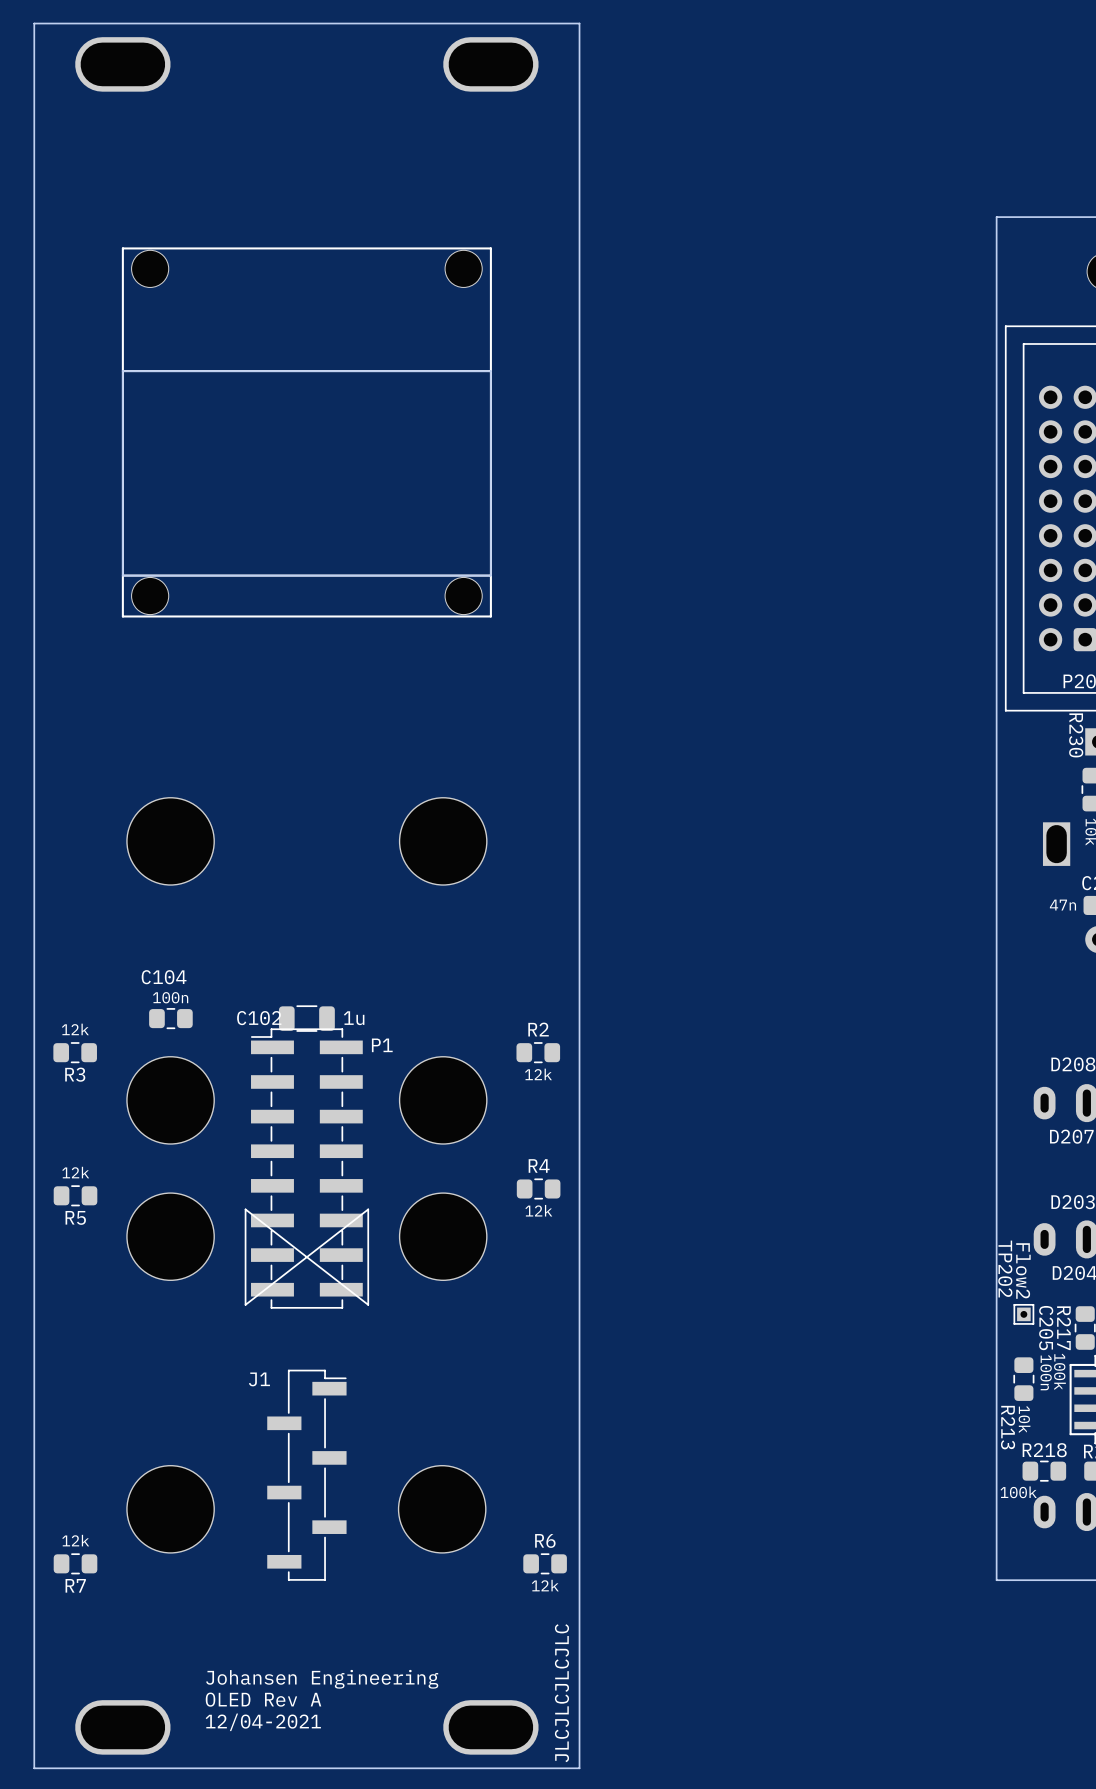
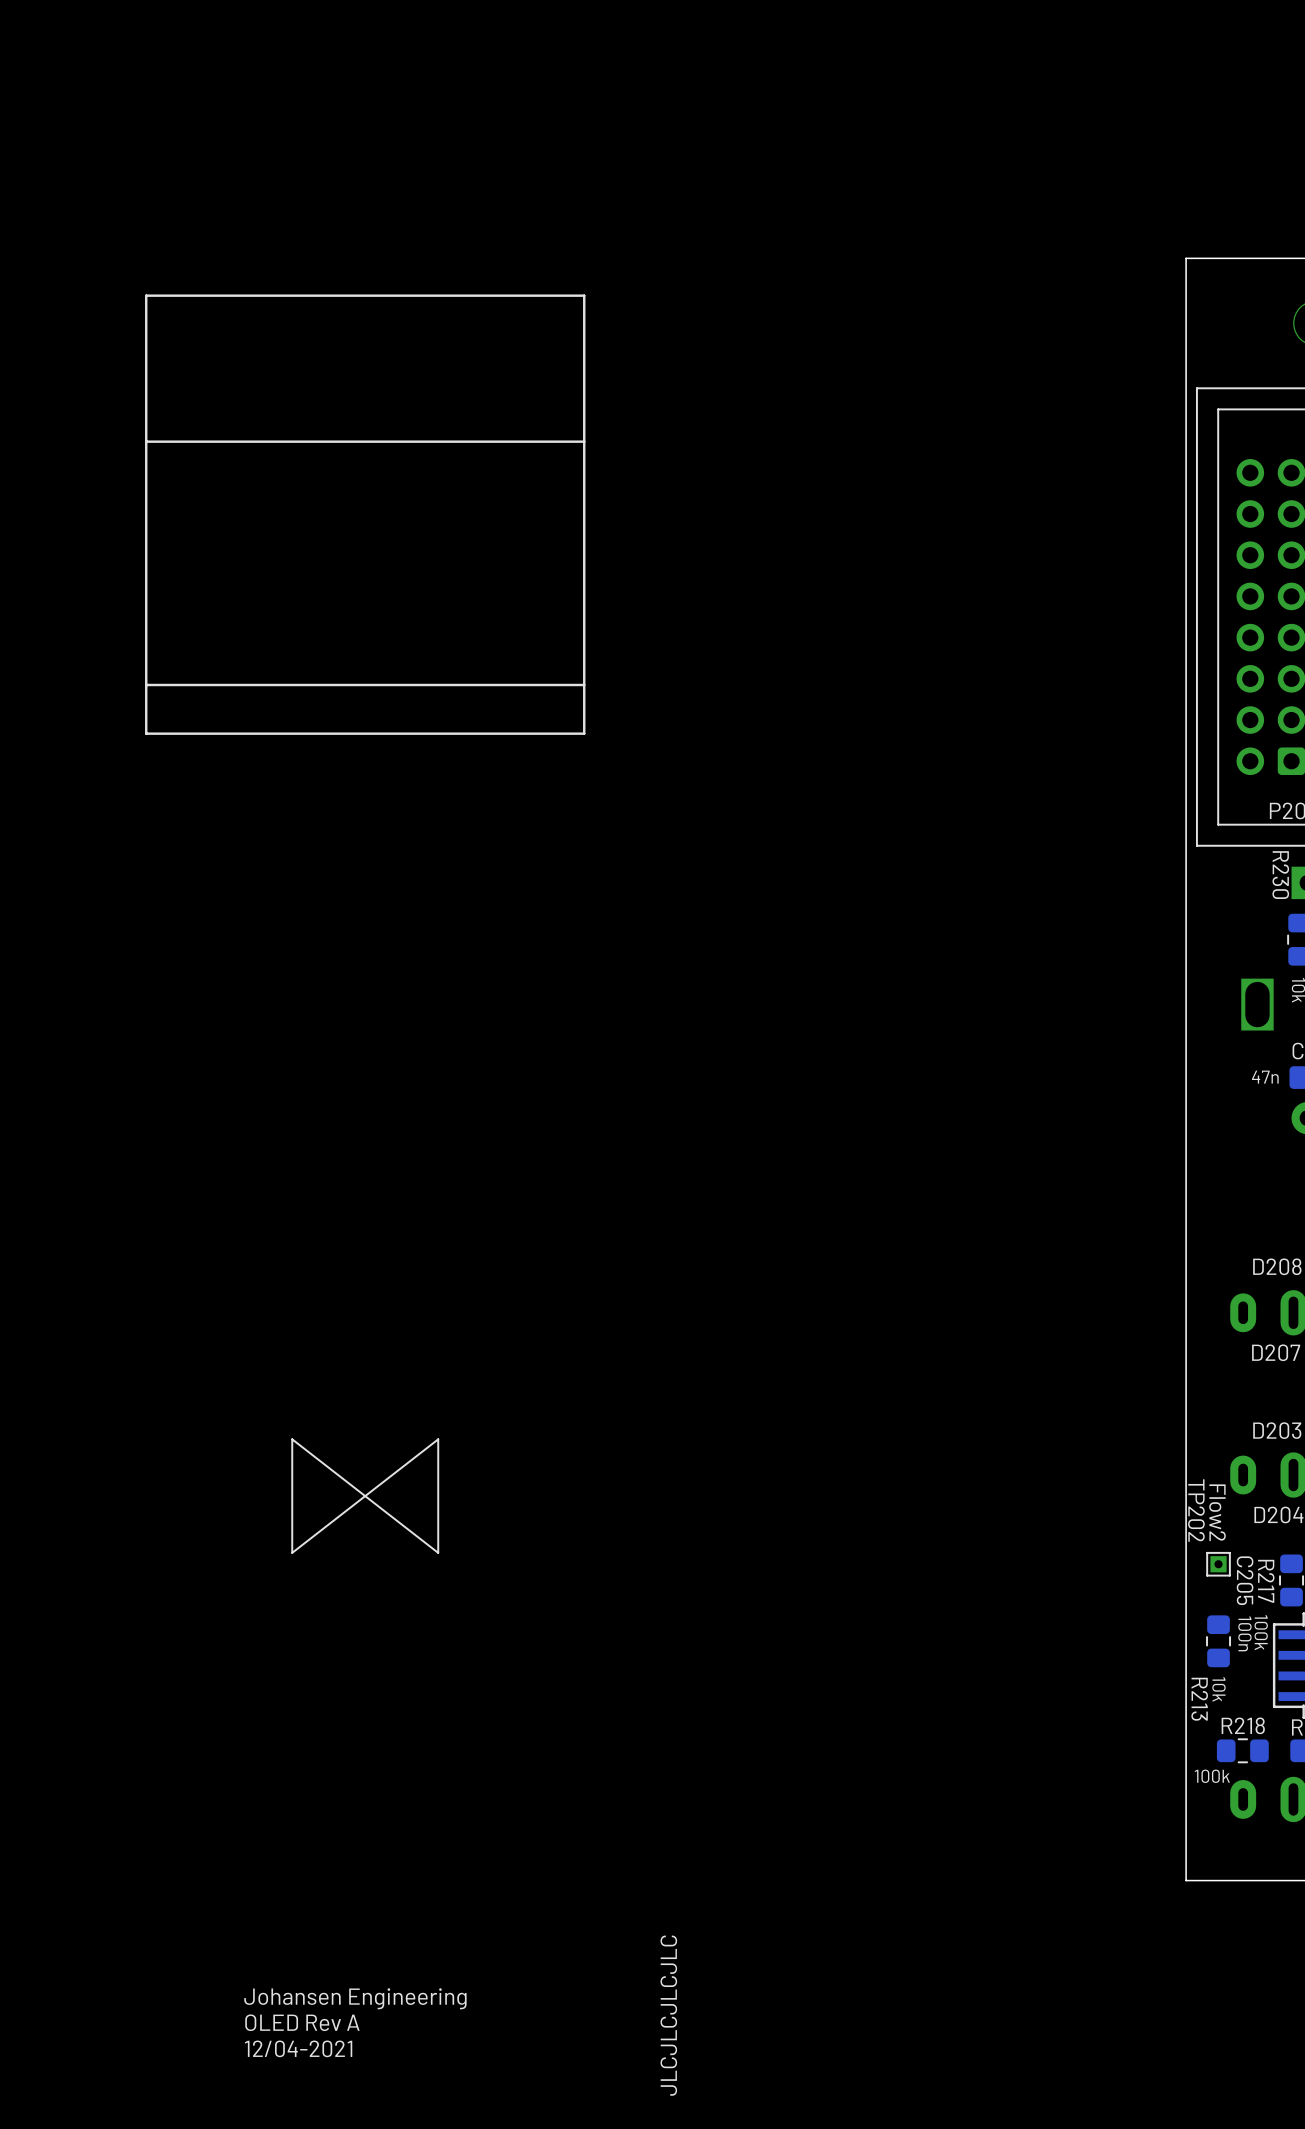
board edge: (579, 23) (34, 23) (34, 1768) (579, 1768) (579, 23) -> none
part: (122, 64) -> none
part: (490, 64) -> none
part: (150, 268) -> none
part: (463, 268) -> none
board edge: (490, 371) (490, 575) (122, 575) (122, 371) (490, 371) -> none
part: (150, 596) -> none
part: (463, 596) -> none
part: (170, 841) -> none
part: (443, 841) -> none
C104: 100n (170, 1018) -> none
C102: 1u (306, 1018) -> none
R3: 12k (75, 1052) -> none
R2: 12k (538, 1052) -> none
part: (170, 1100) -> none
part: (443, 1100) -> none
P1: (306, 1168) -> none
R4: 12k (538, 1188) -> none
R5: 12k (75, 1195) -> none
part: (170, 1236) -> none
part: (443, 1236) -> none
J1: (306, 1475) -> none
part: (170, 1509) -> none
part: (442, 1509) -> none
R7: 12k (75, 1563) -> none
R6: 12k (545, 1563) -> none
part: (122, 1727) -> none
part: (490, 1727) -> none

